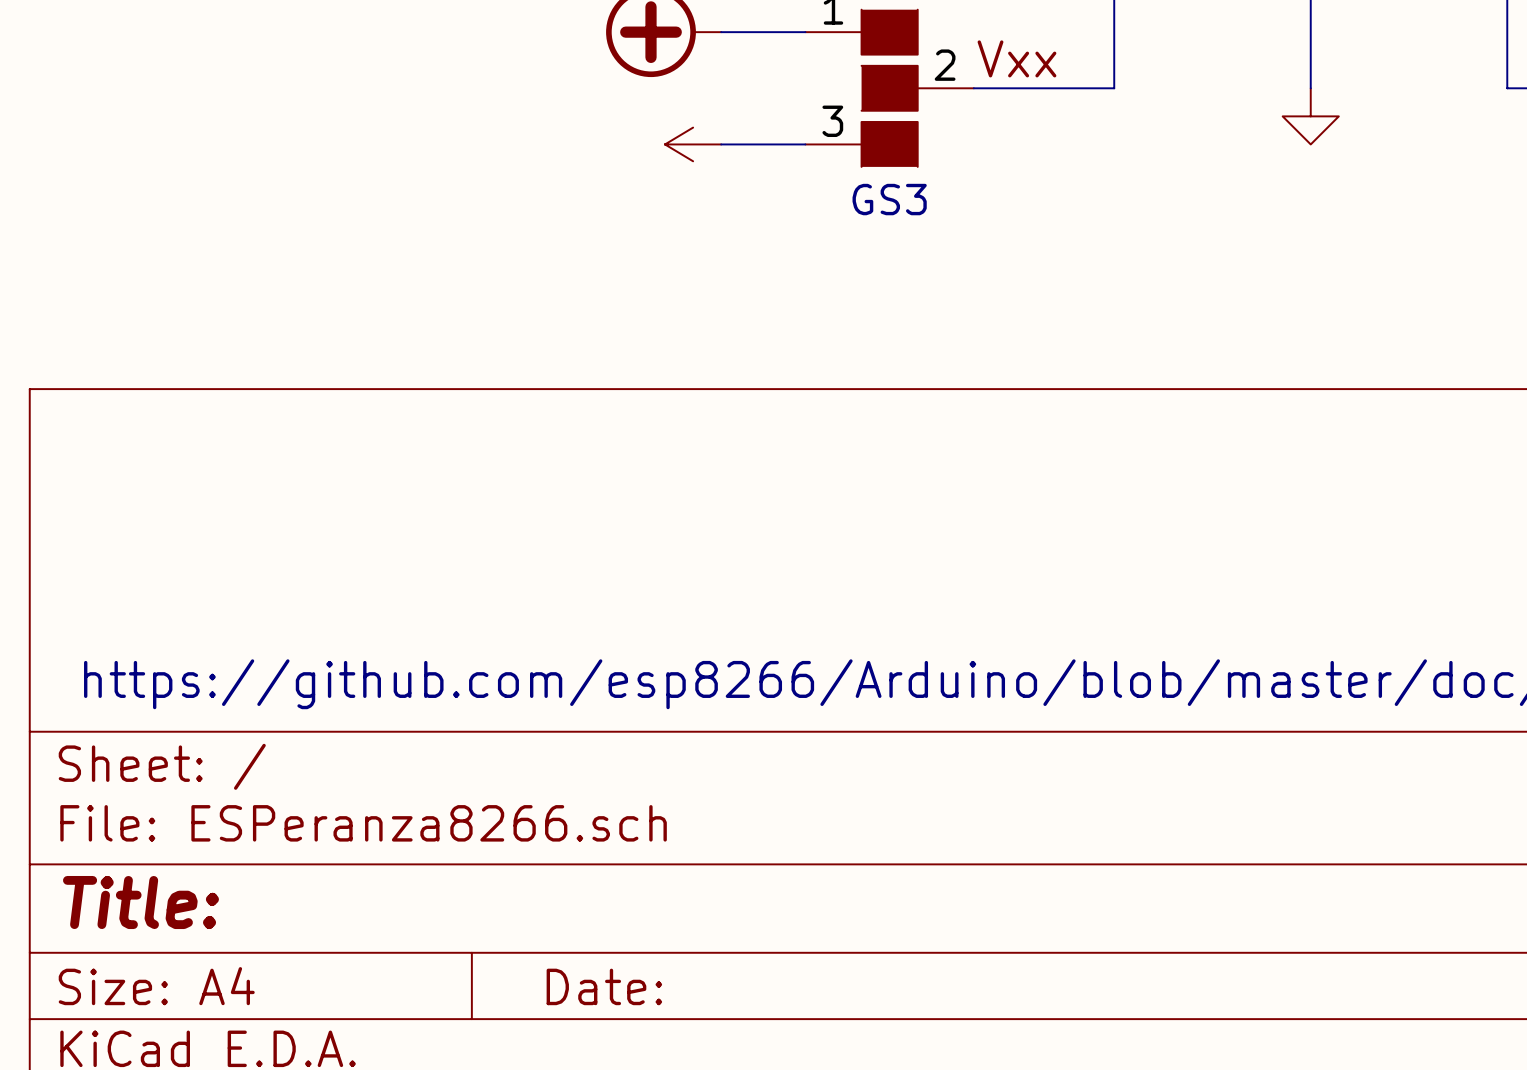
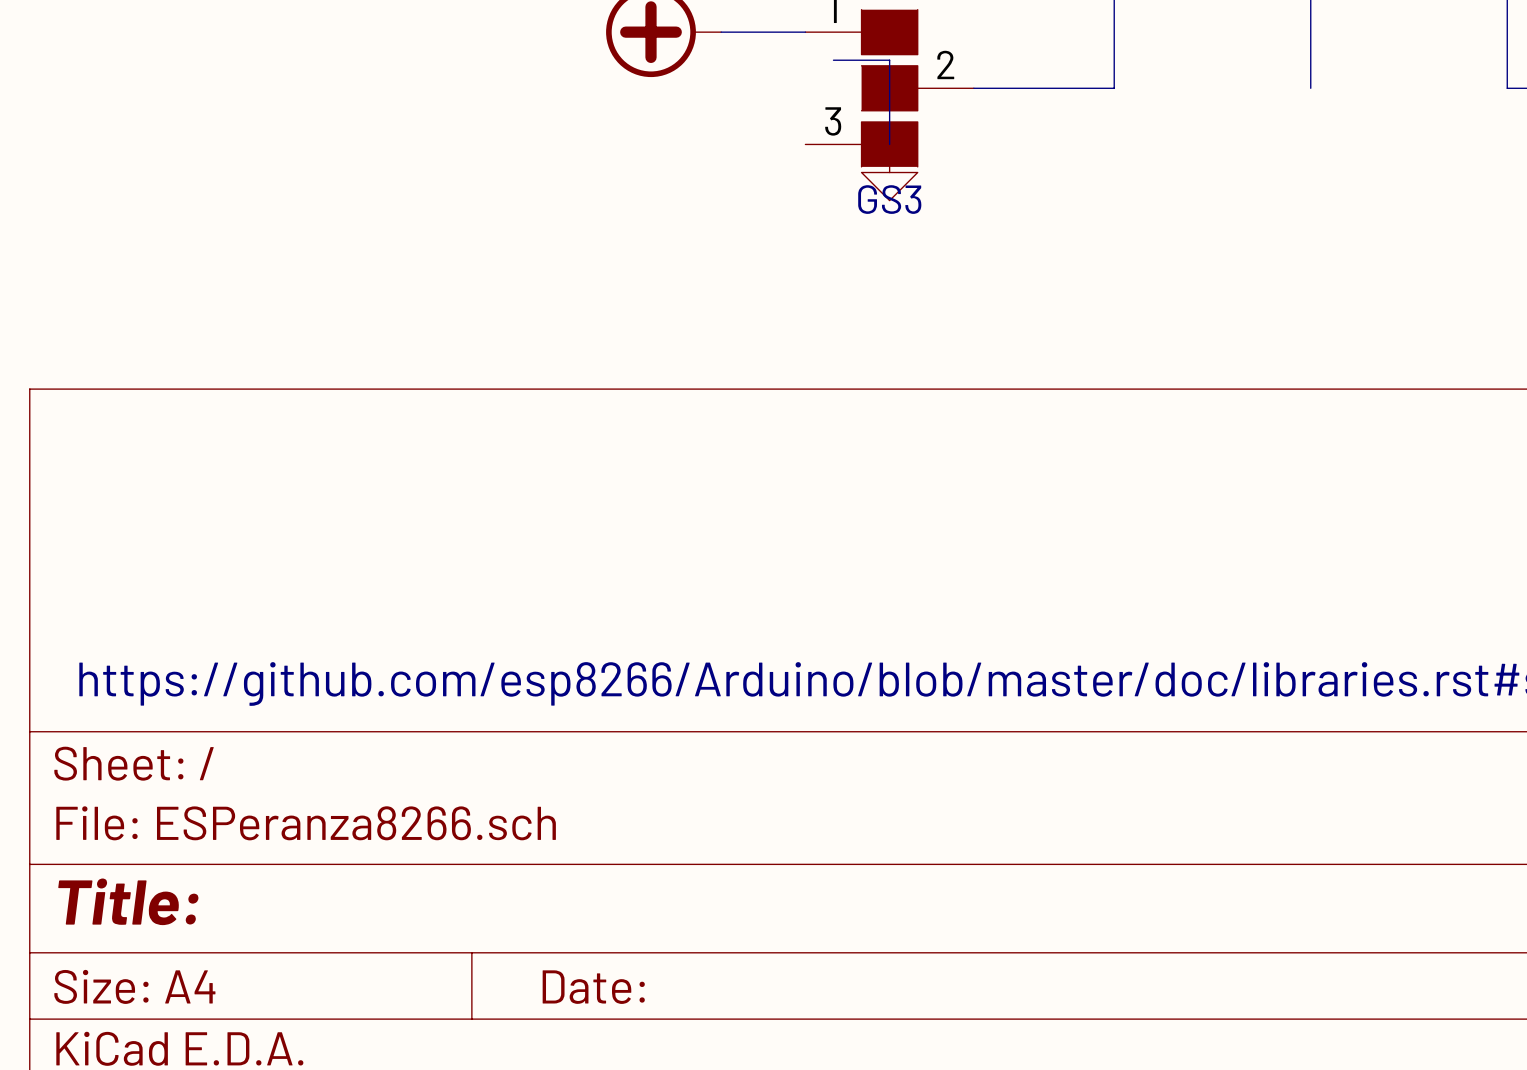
label: Vxx (1016, 58) -> none
wire: none -> (833, 60) (889, 60) (889, 144)
power symbol: (1310, 116) -> none
power symbol: (693, 144) -> none
wire: (721, 144) (805, 144) -> none
power symbol: none -> (889, 172)

